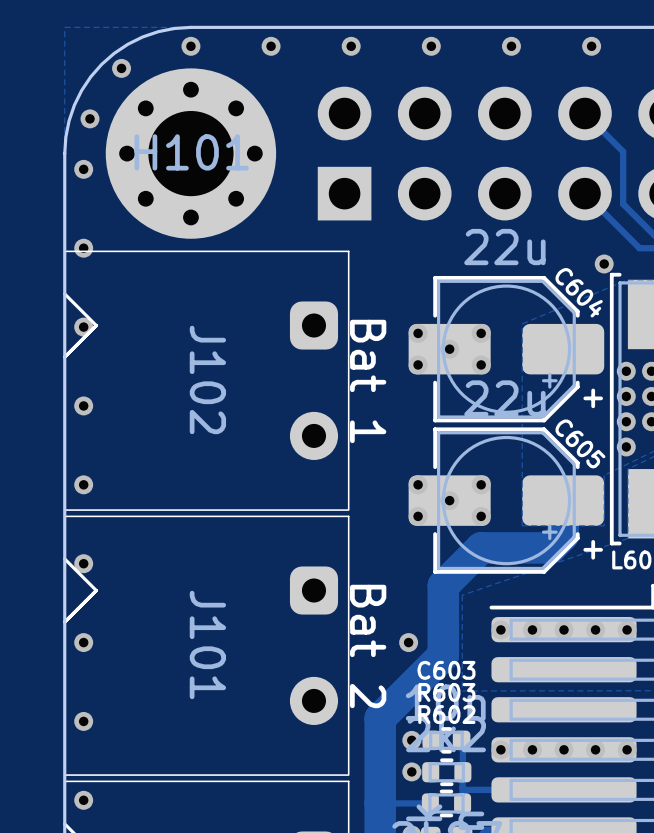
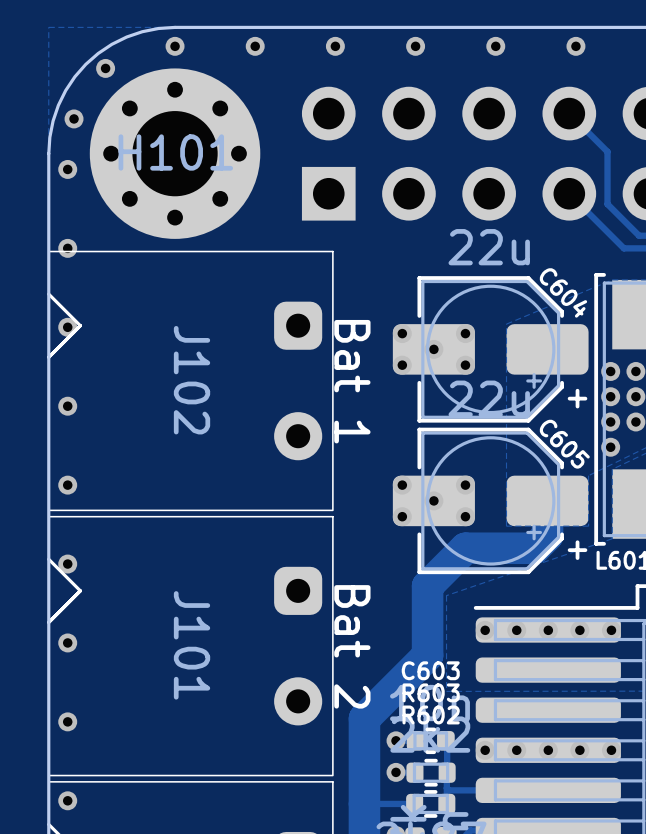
via: (604, 263) -> none
via: (408, 642) -> none

